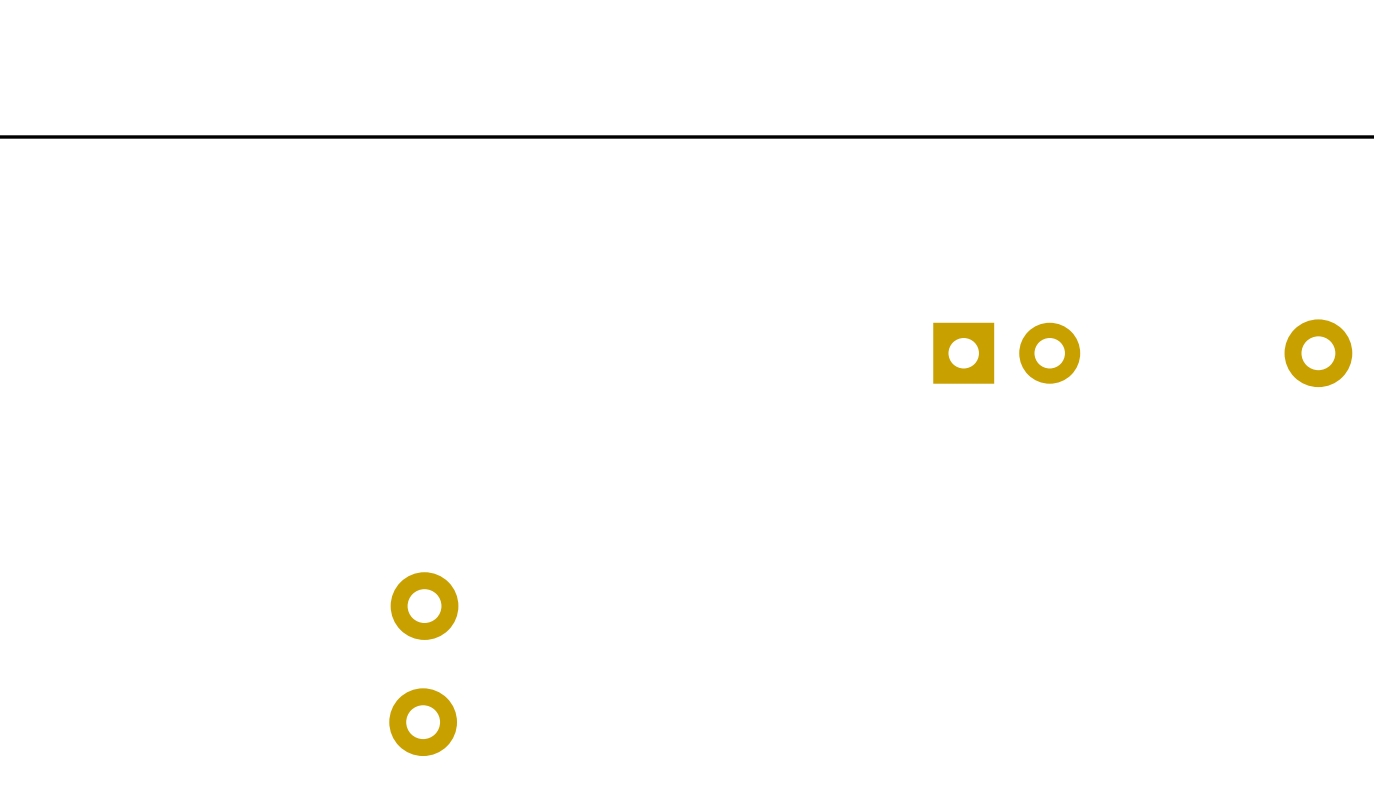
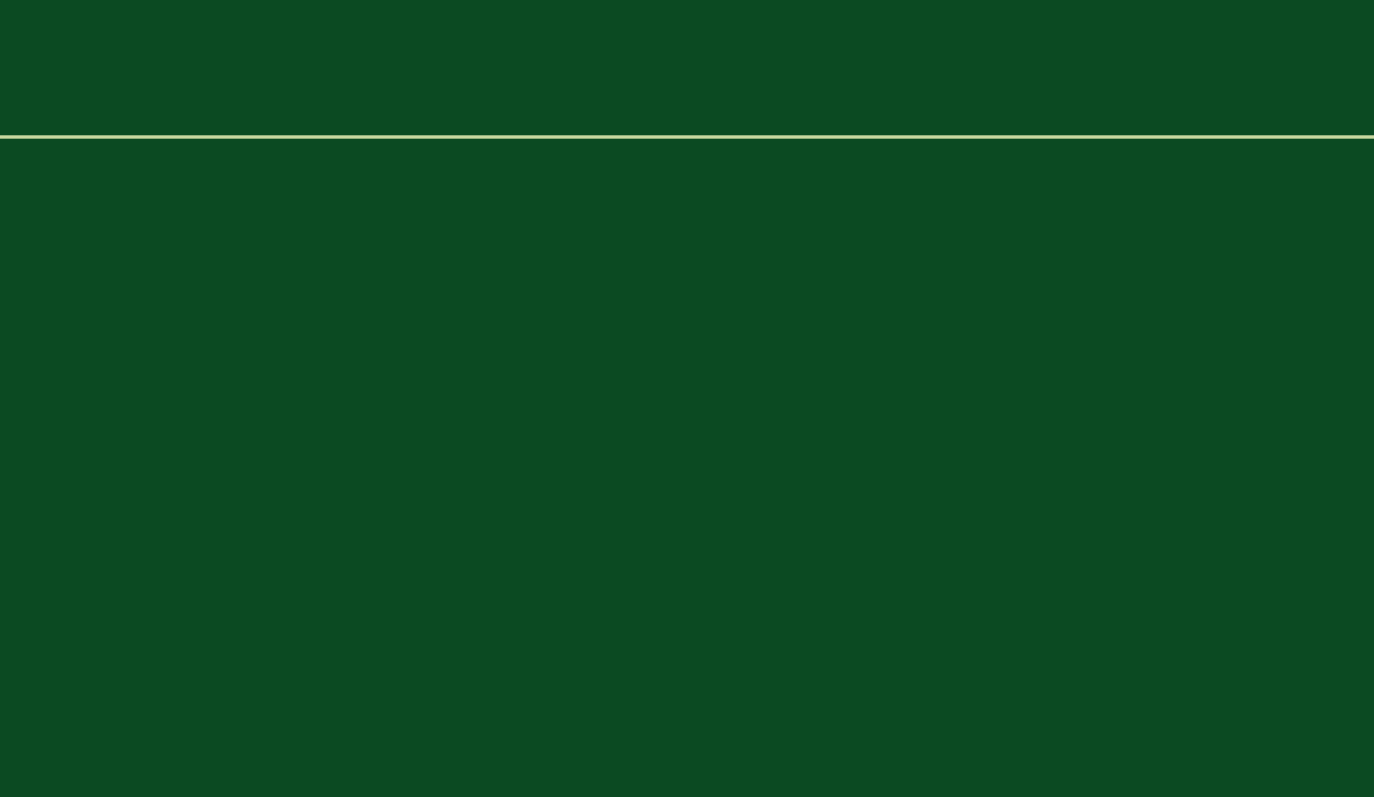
part: (1006, 353) -> none
part: (1318, 353) -> none
part: (424, 606) -> none
part: (423, 722) -> none

